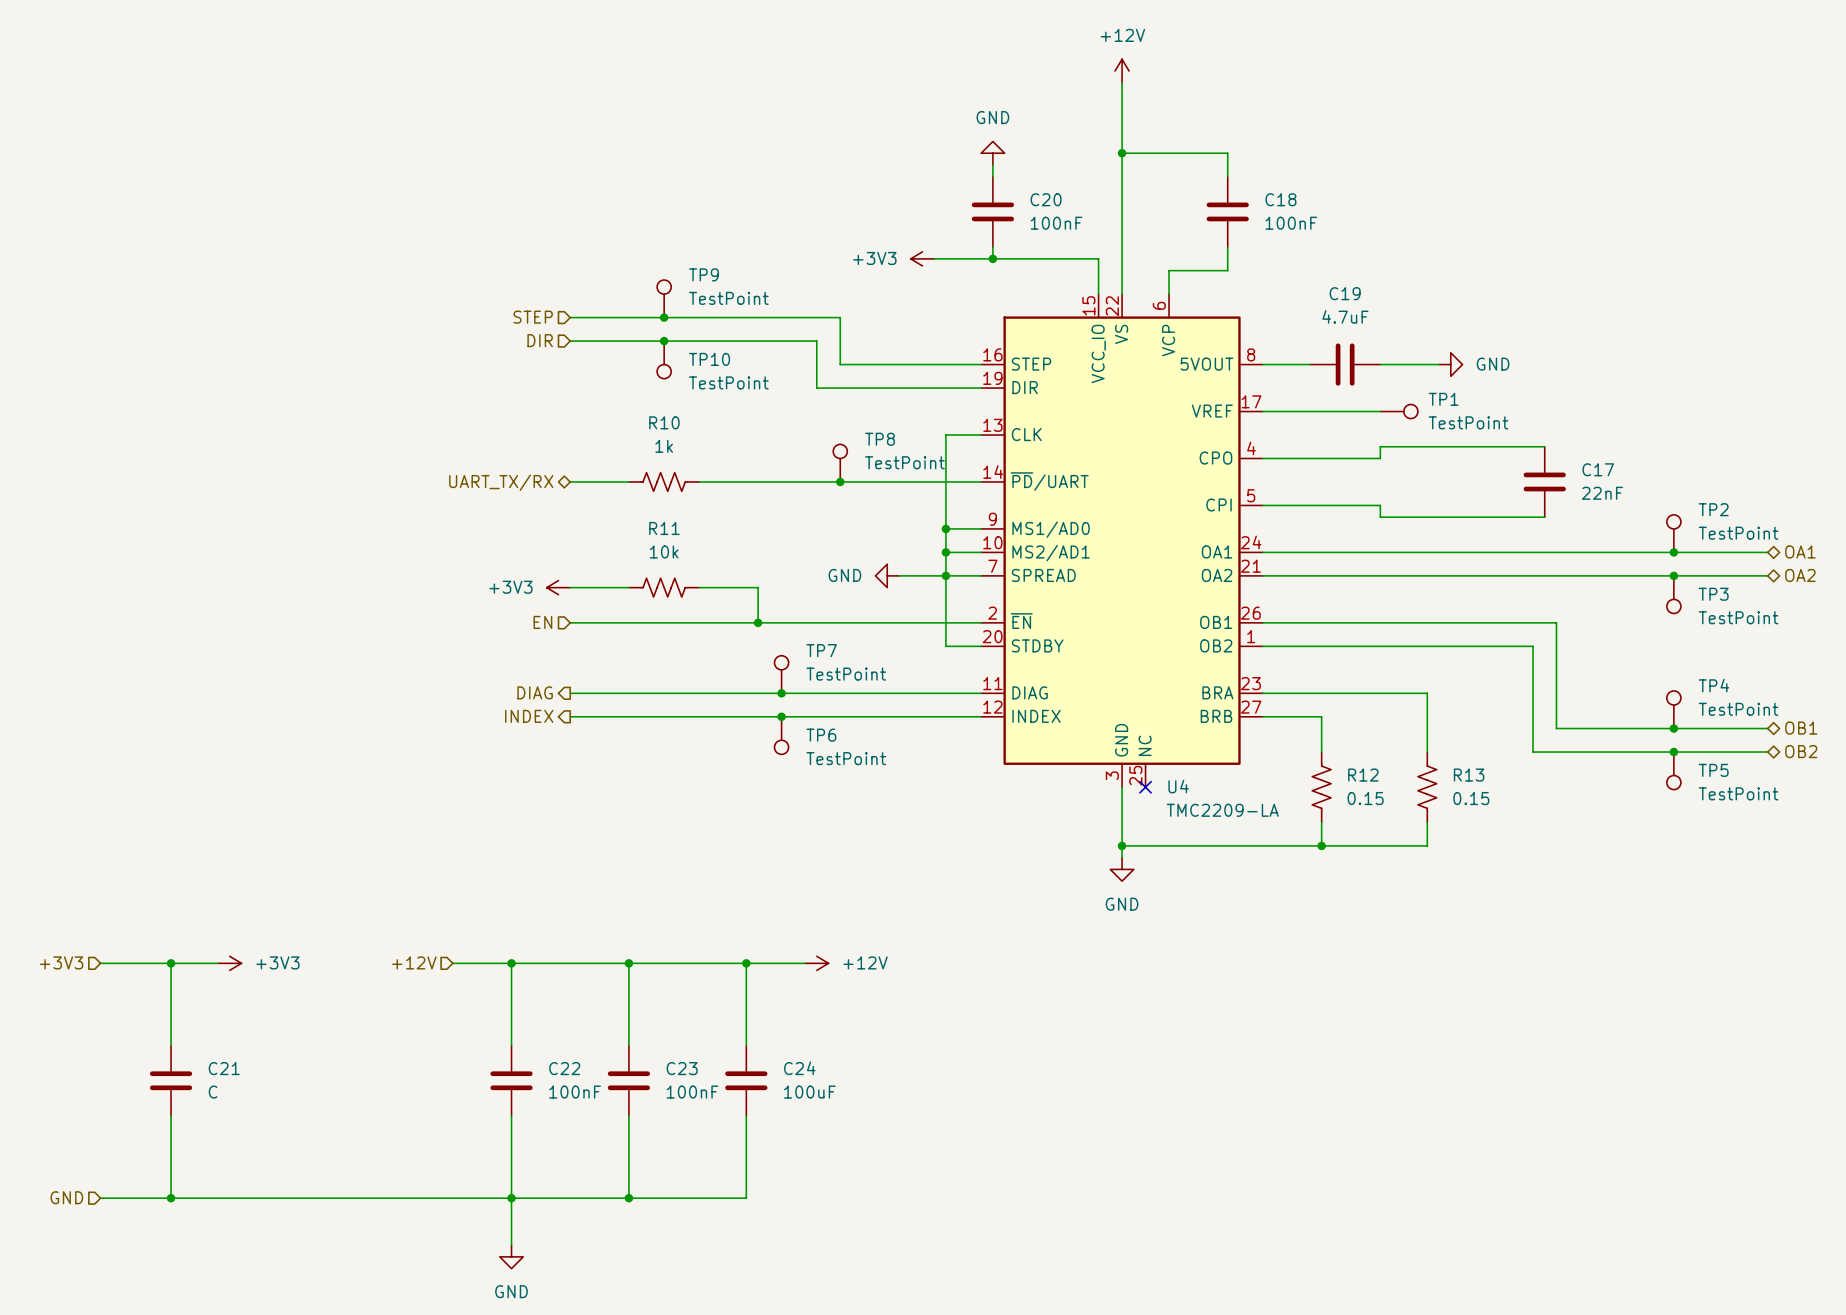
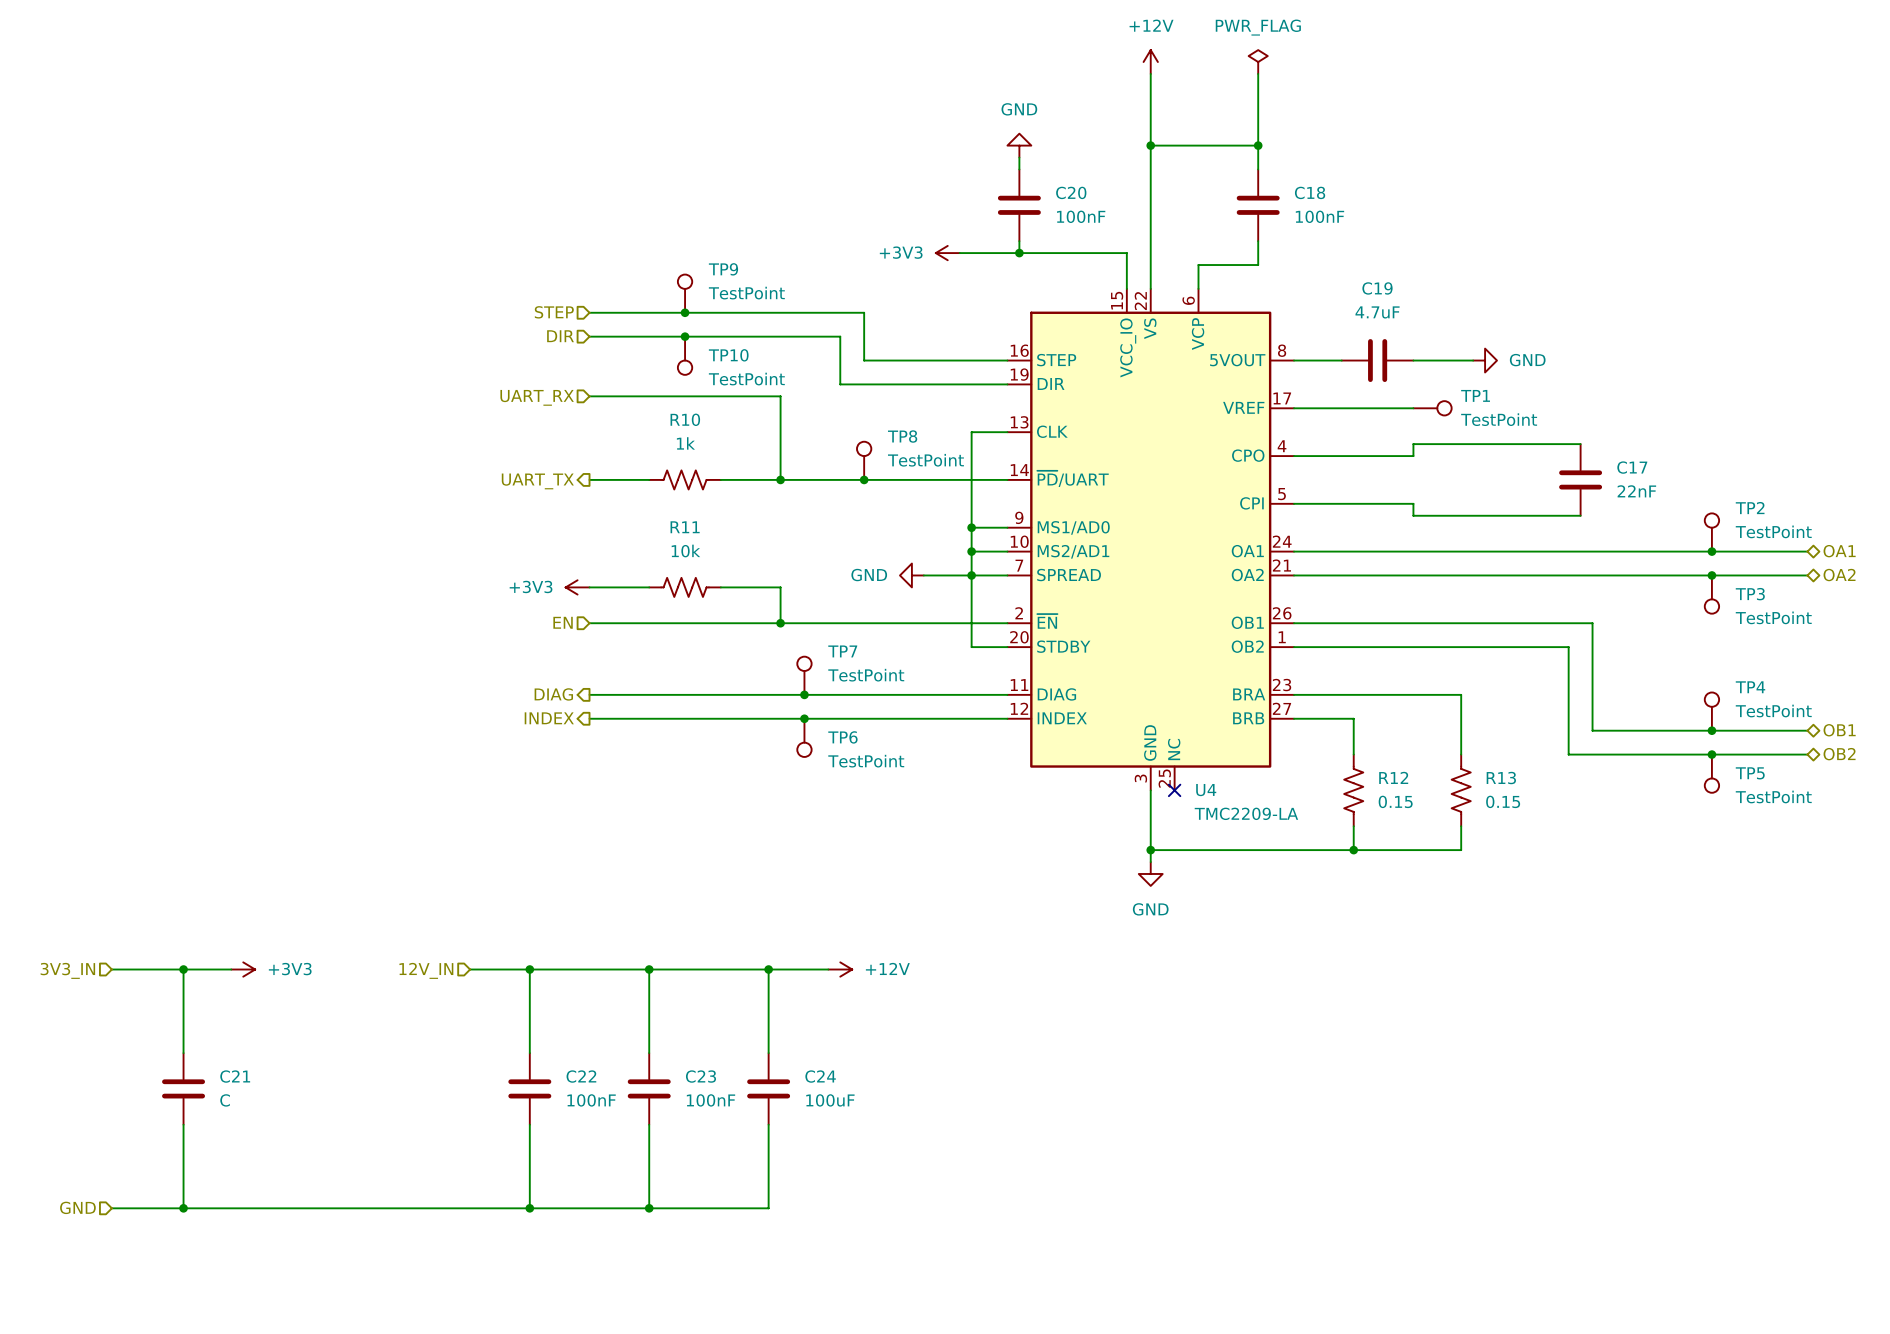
power symbol: none -> PWR_FLAG (1258, 62)
wire: none -> (1258, 73) (1258, 145)
junction: none -> (1258, 145)
hierarchical label: none -> UART_RX (537, 397)
wire: none -> (589, 396) (780, 396) (780, 479)
junction: none -> (780, 479)
hierarchical label shape: bidirectional (501, 482) -> output (537, 481)
hierarchical label: UART_TX/RX (501, 482) -> UART_TX (537, 481)
hierarchical label: +3V3 (61, 962) -> 3V3_IN (67, 970)
hierarchical label: +12V (414, 962) -> 12V_IN (426, 970)
wire: (511, 1198) (511, 1245) -> none
power symbol: GND (511, 1256) -> none

